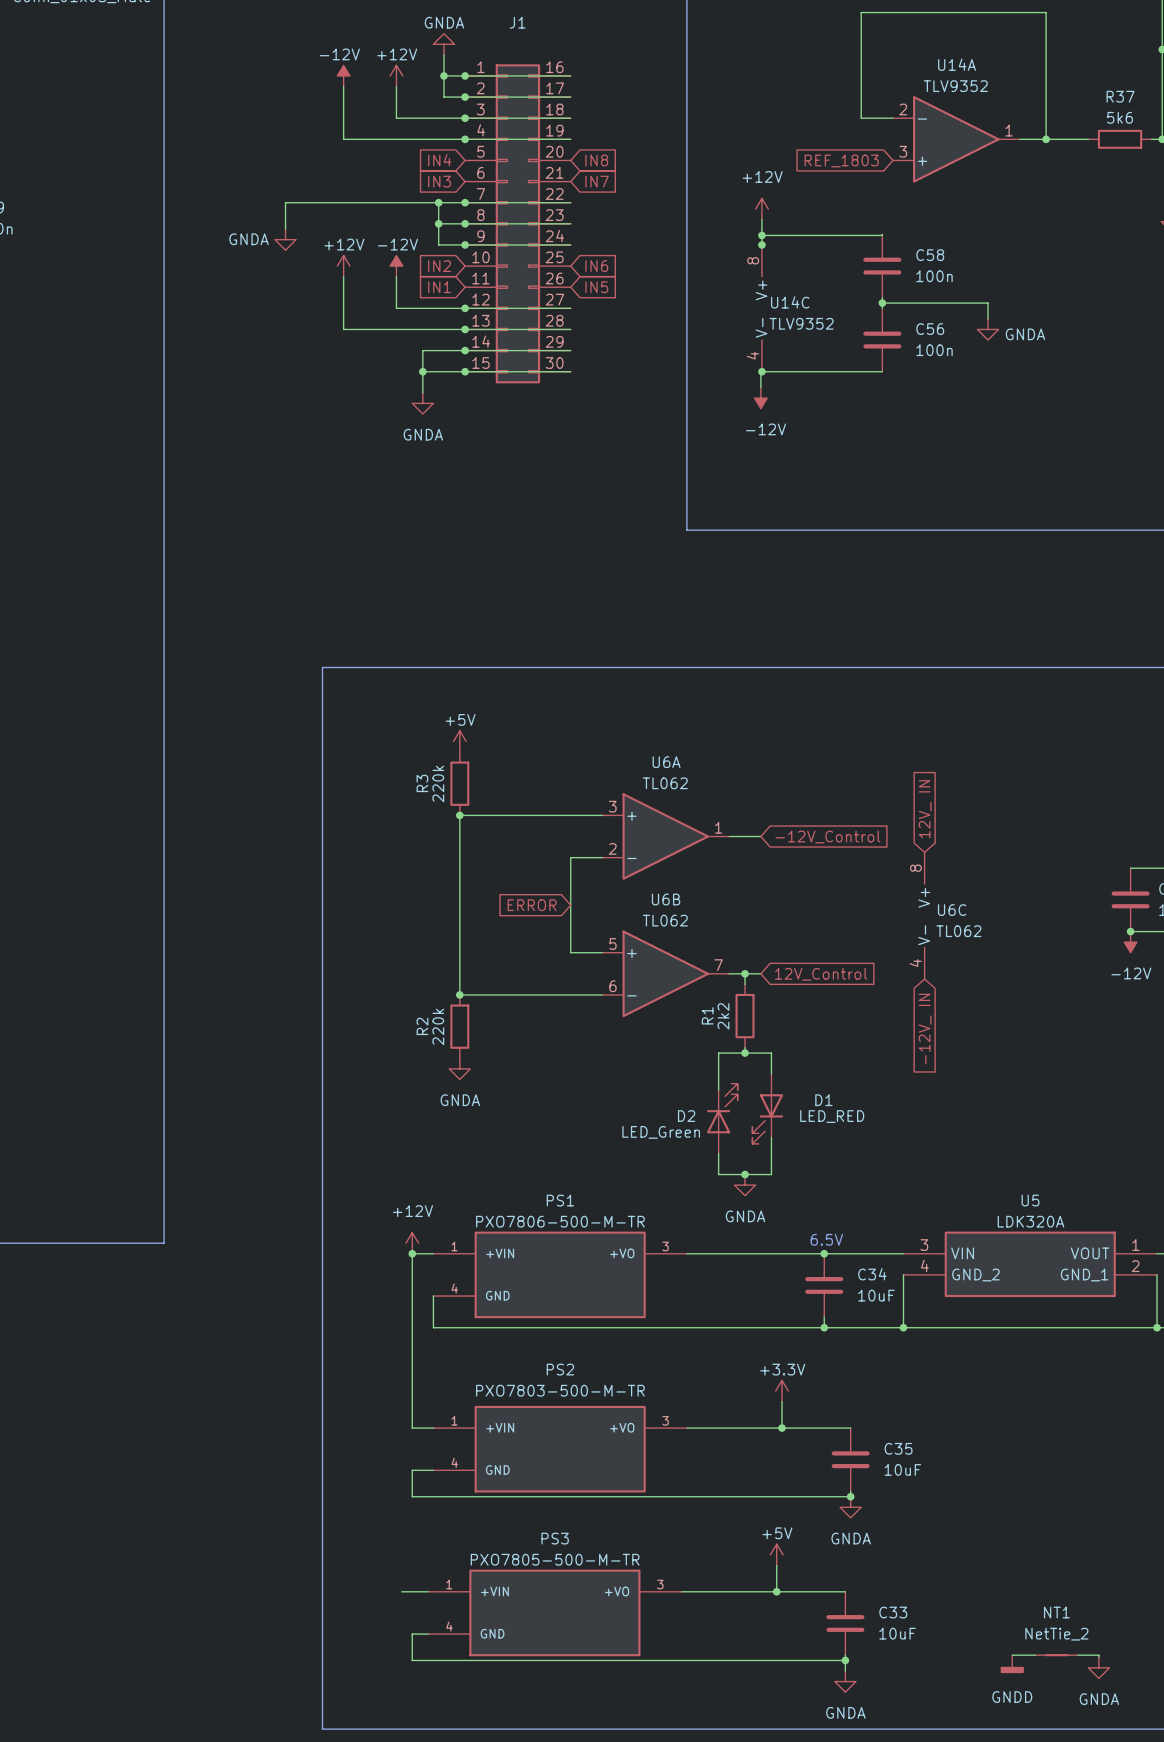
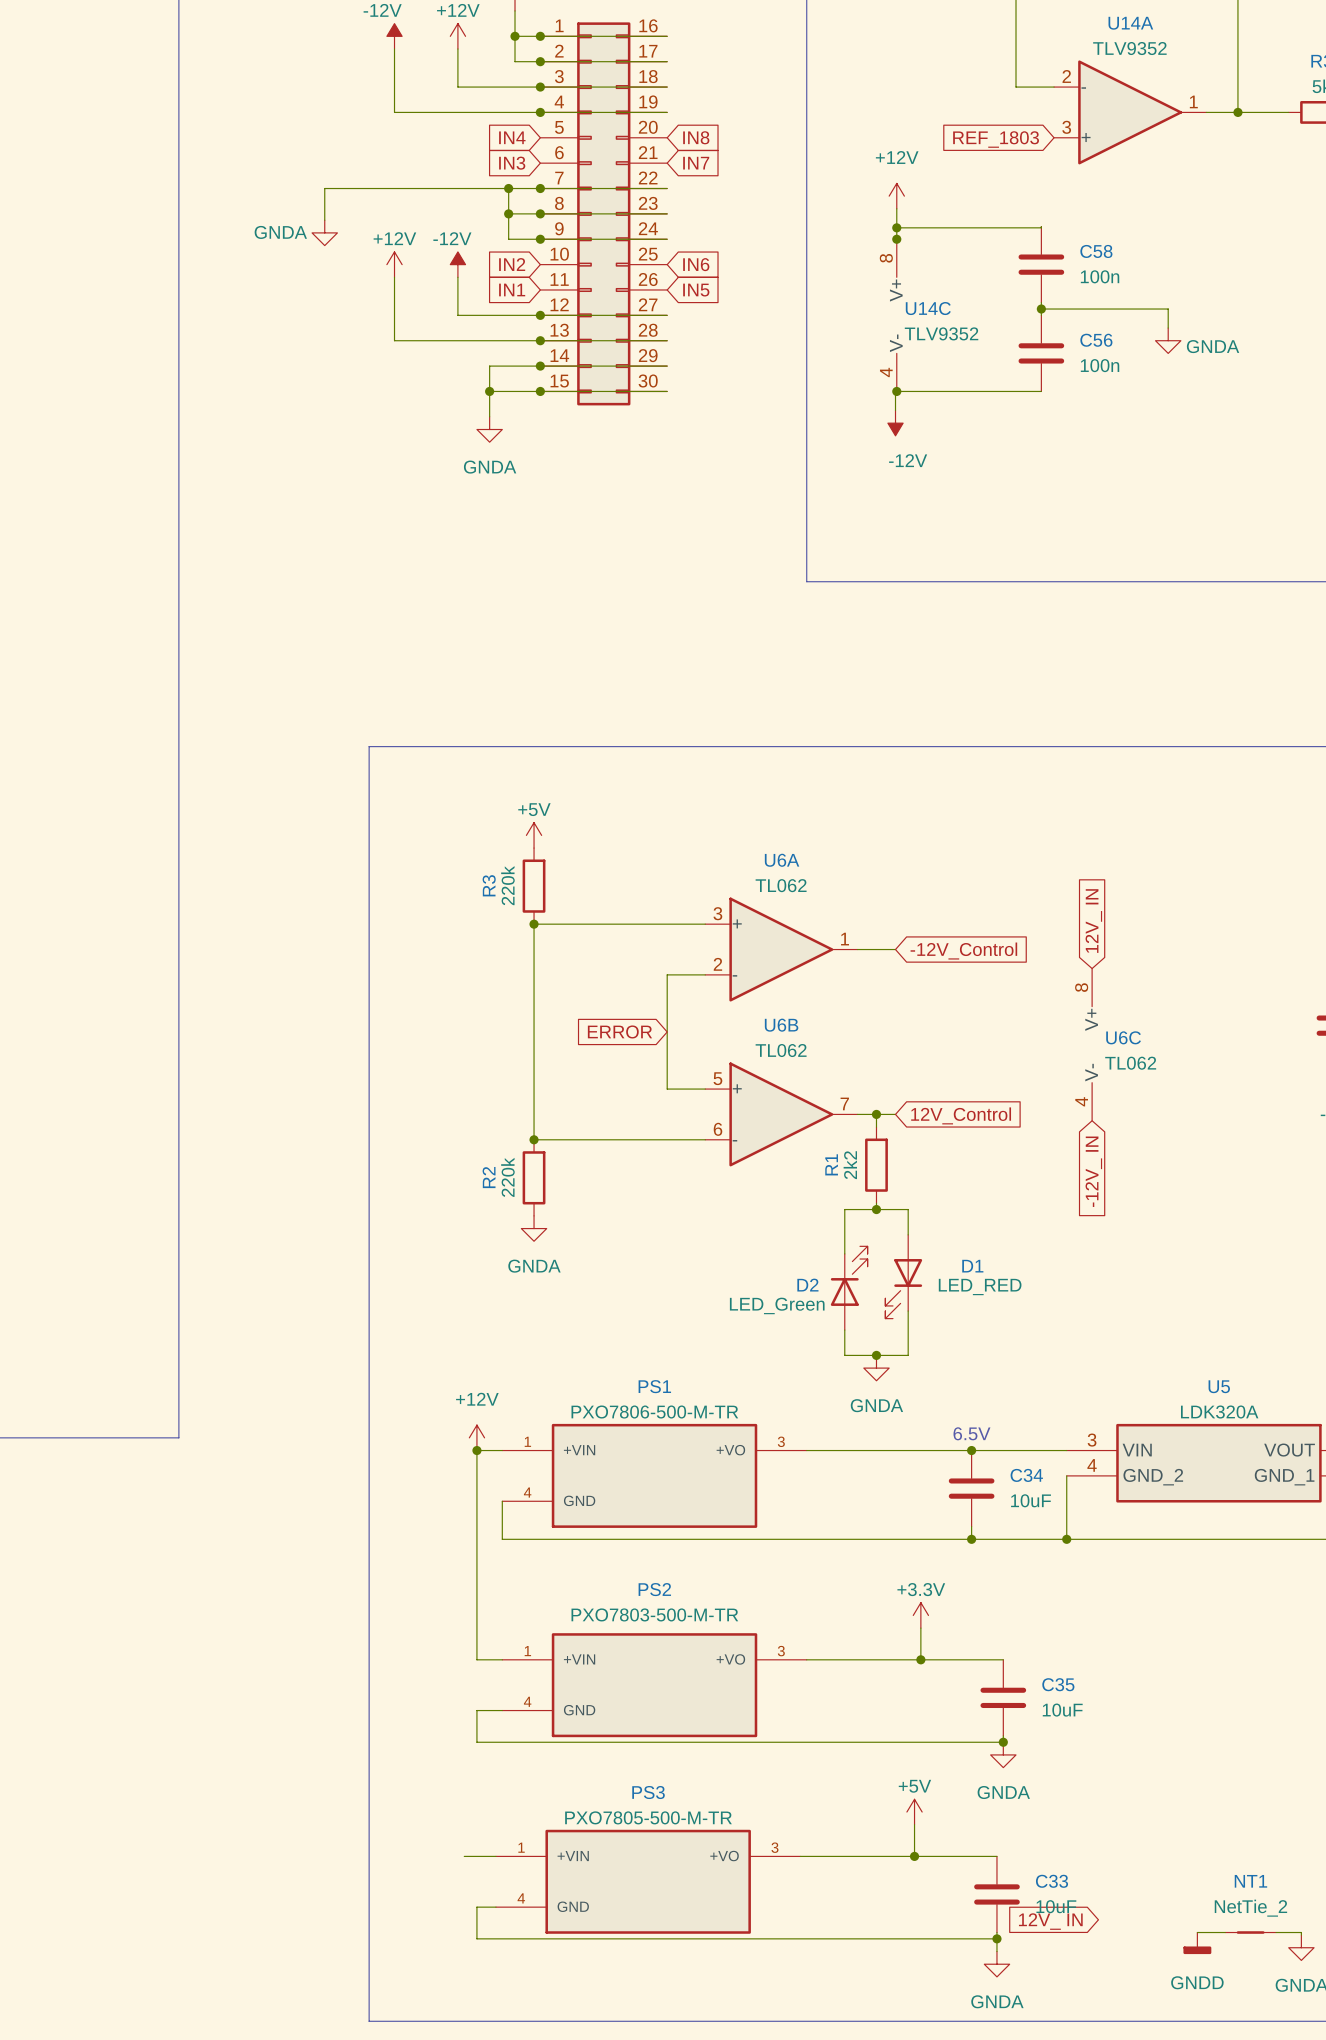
global label: none -> 12V_ IN (1050, 1921)

